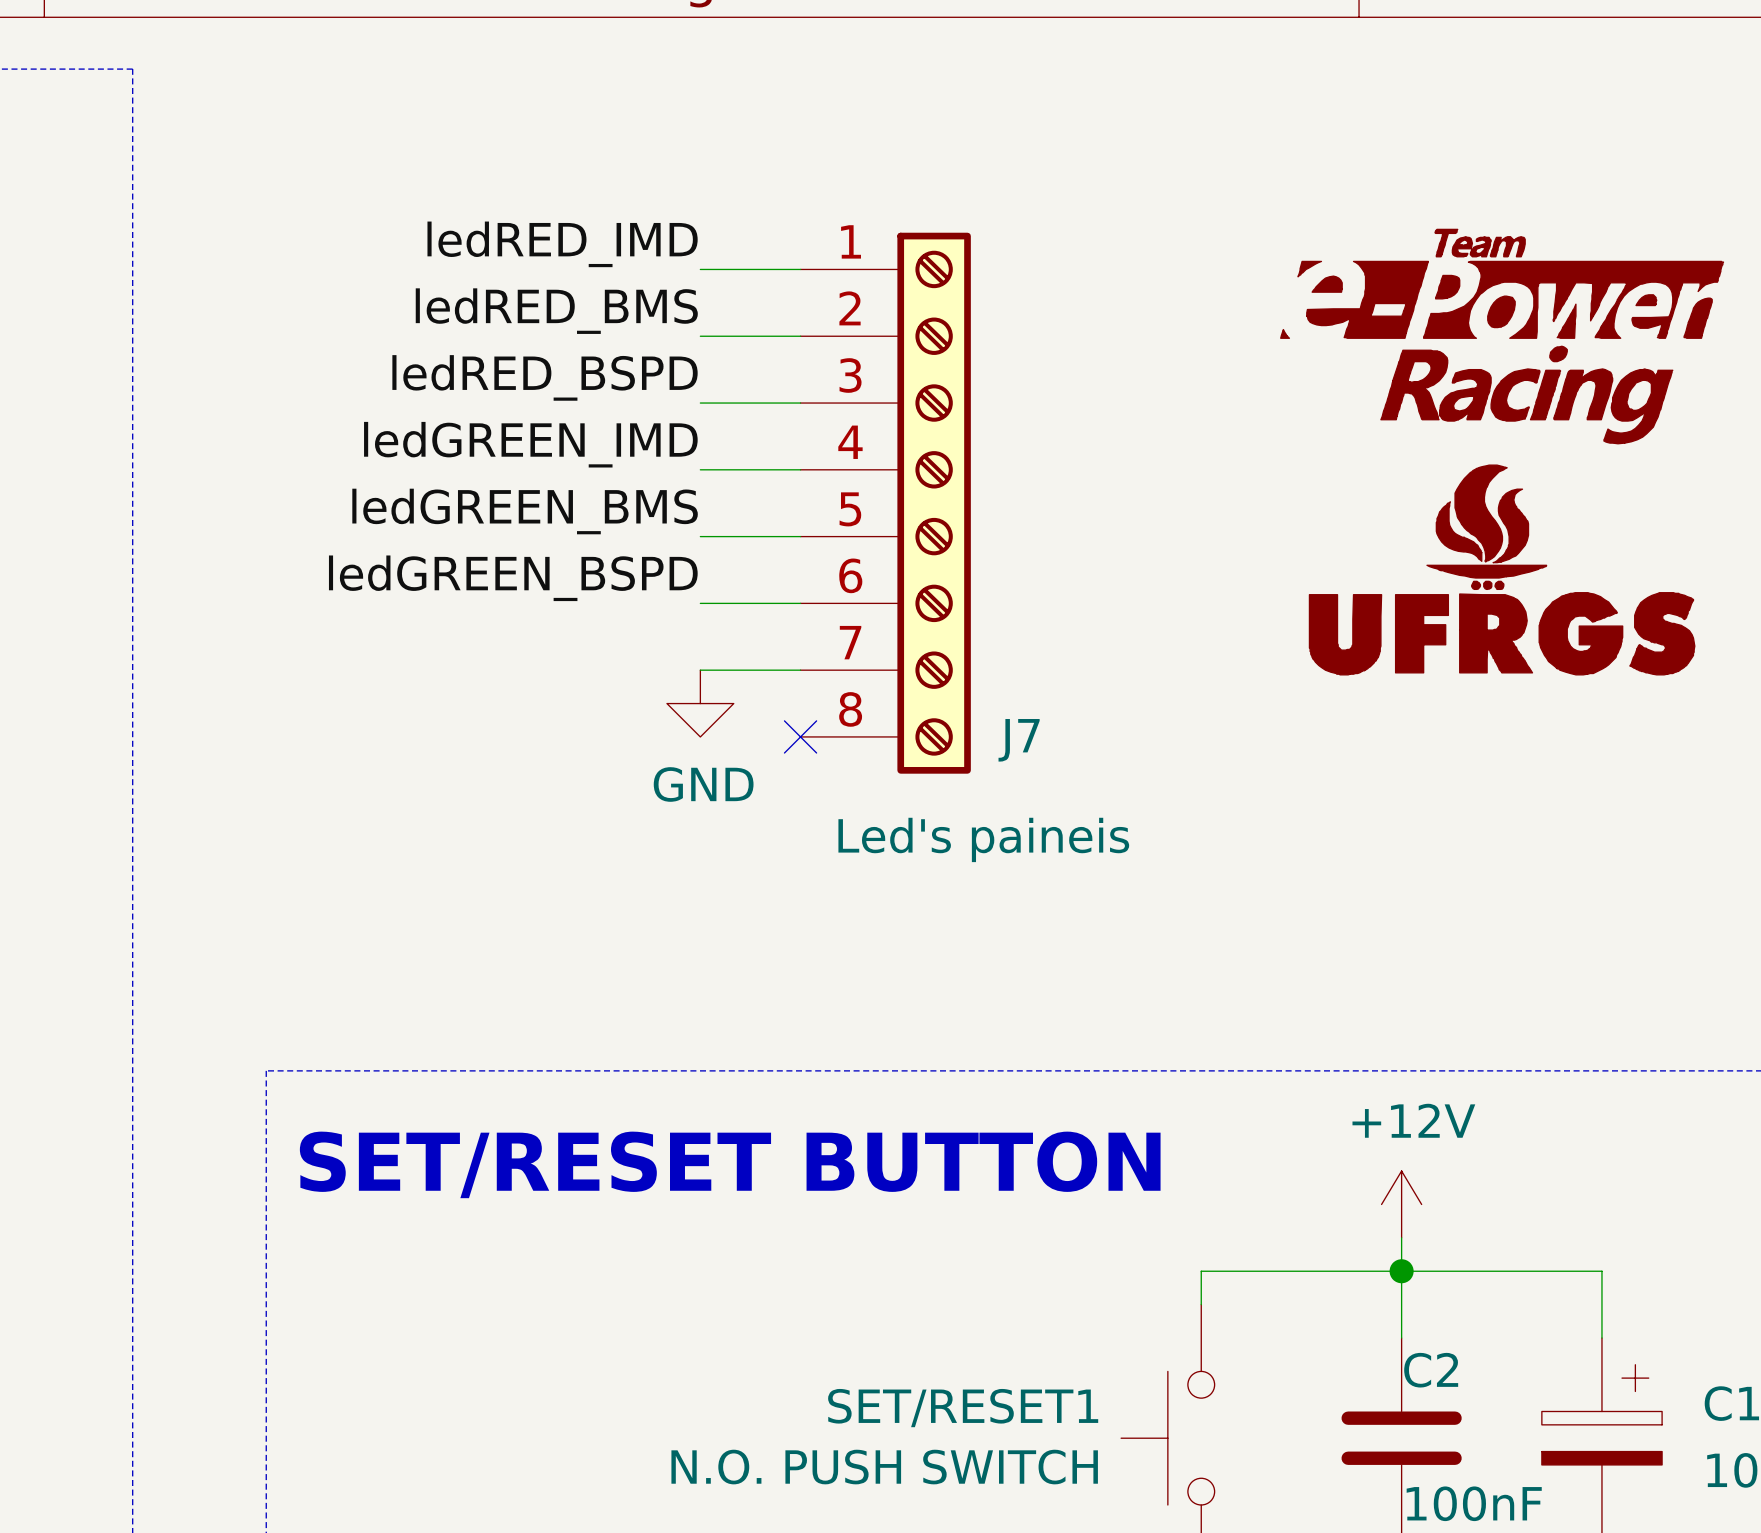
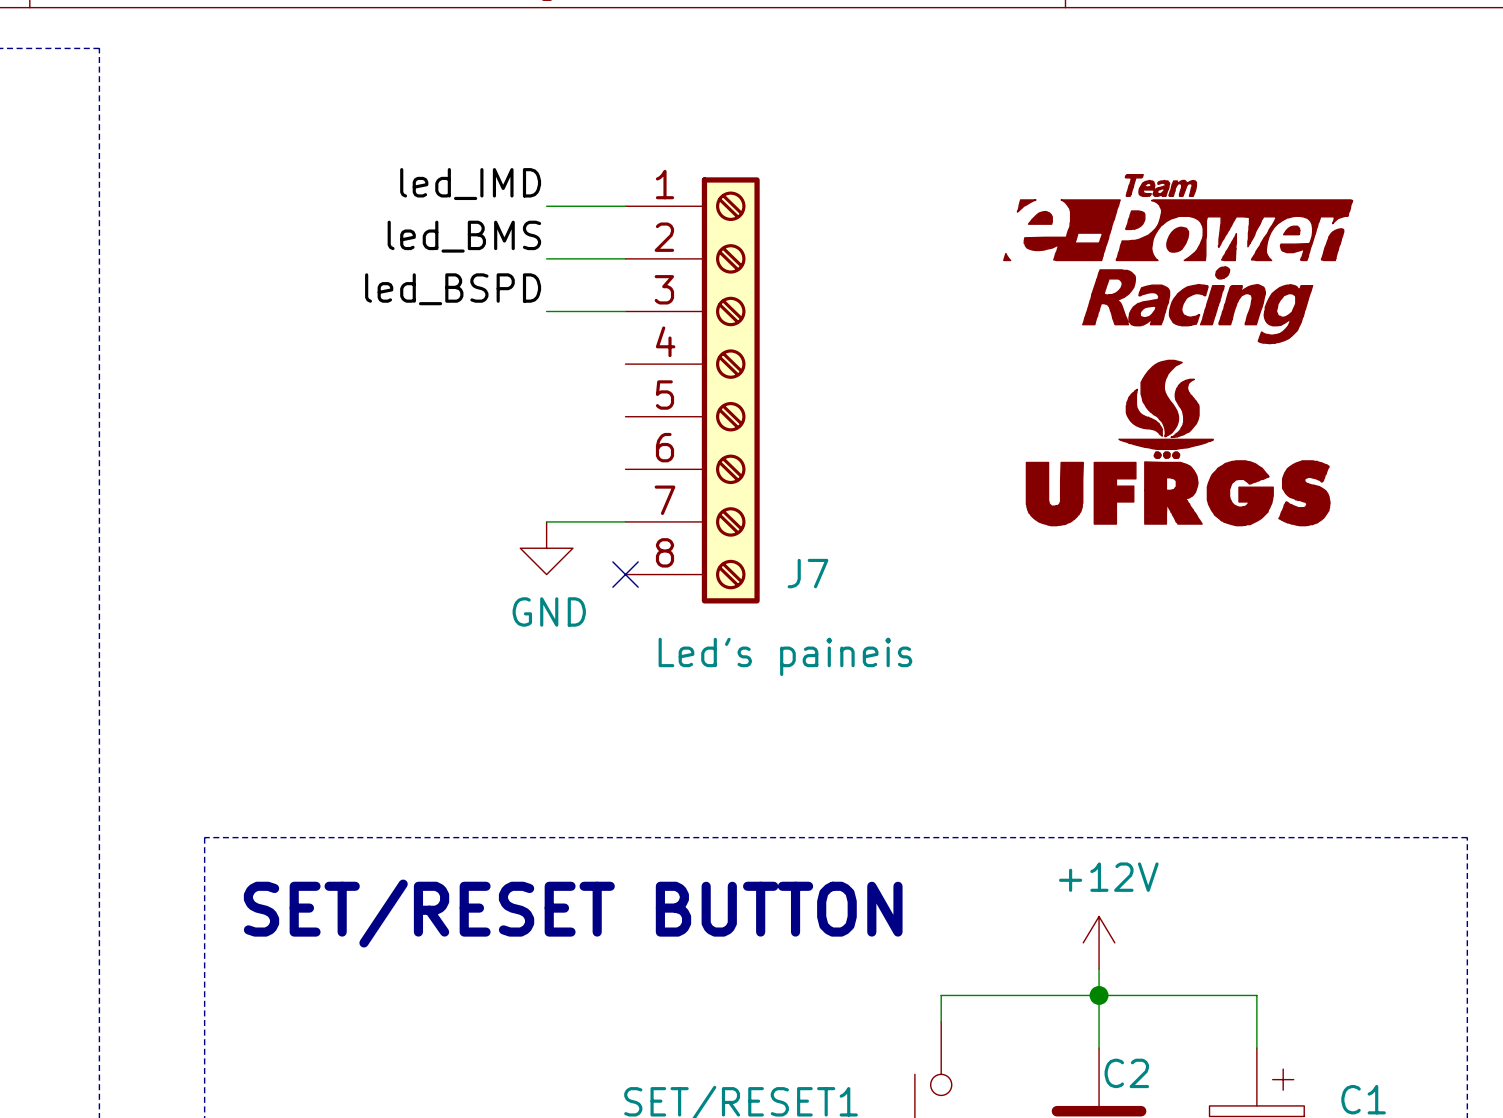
label: ledRED_IMD (562, 244) -> led_IMD (470, 184)
label: ledRED_BMS (556, 311) -> led_BMS (464, 236)
label: ledRED_BSPD (545, 377) -> led_BSPD (453, 289)
label: ledGREEN_IMD (530, 444) -> none
wire: (700, 469) (800, 469) -> none
label: ledGREEN_BMS (525, 511) -> none
wire: (700, 536) (800, 536) -> none
label: ledGREEN_BSPD (513, 578) -> none
wire: (700, 603) (800, 603) -> none

